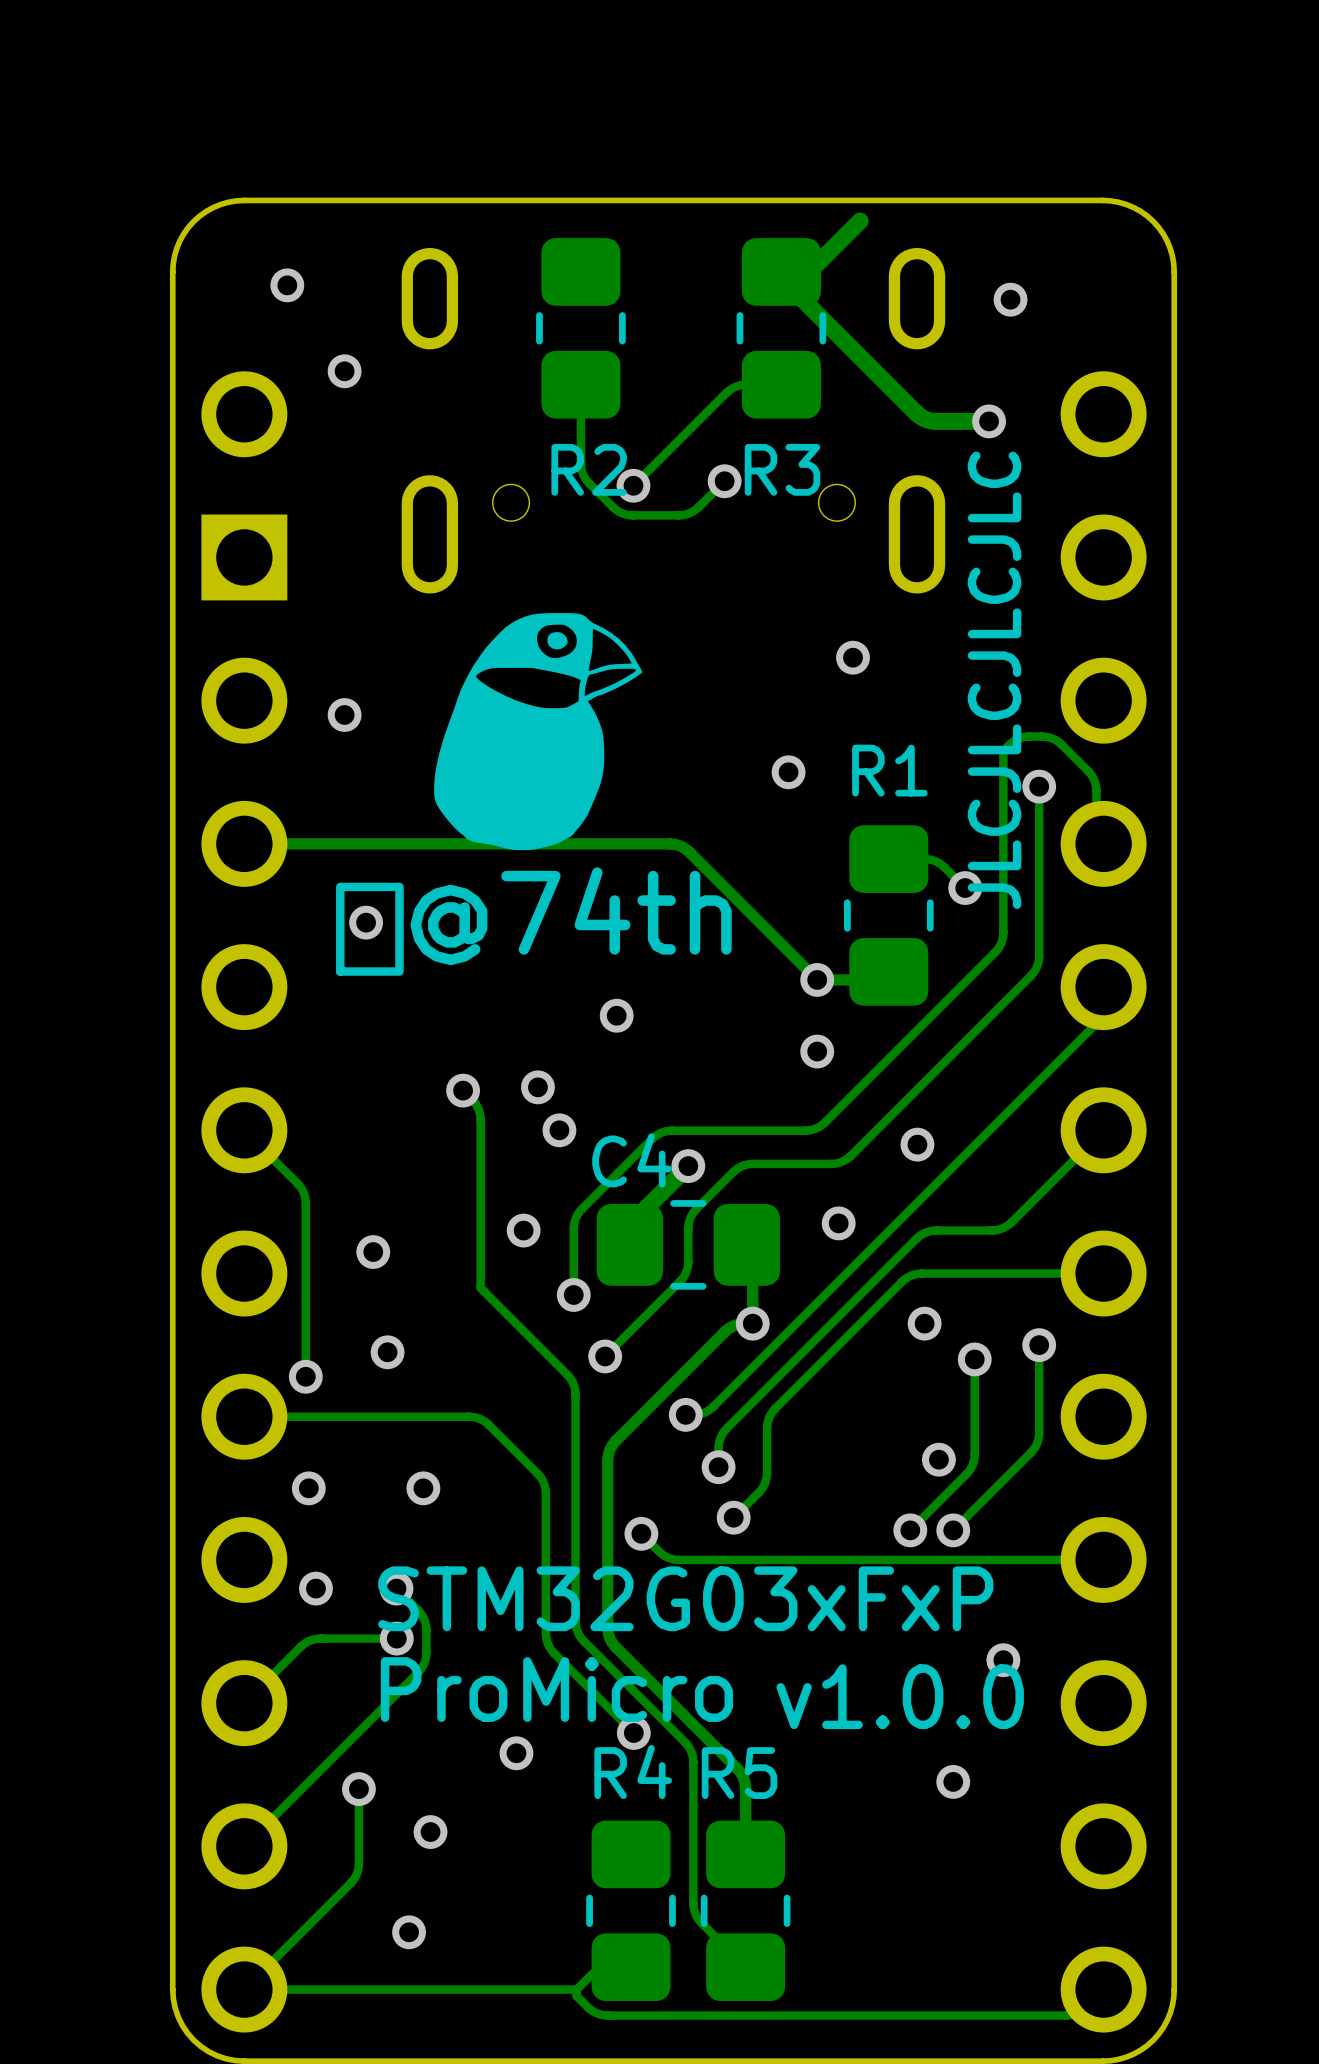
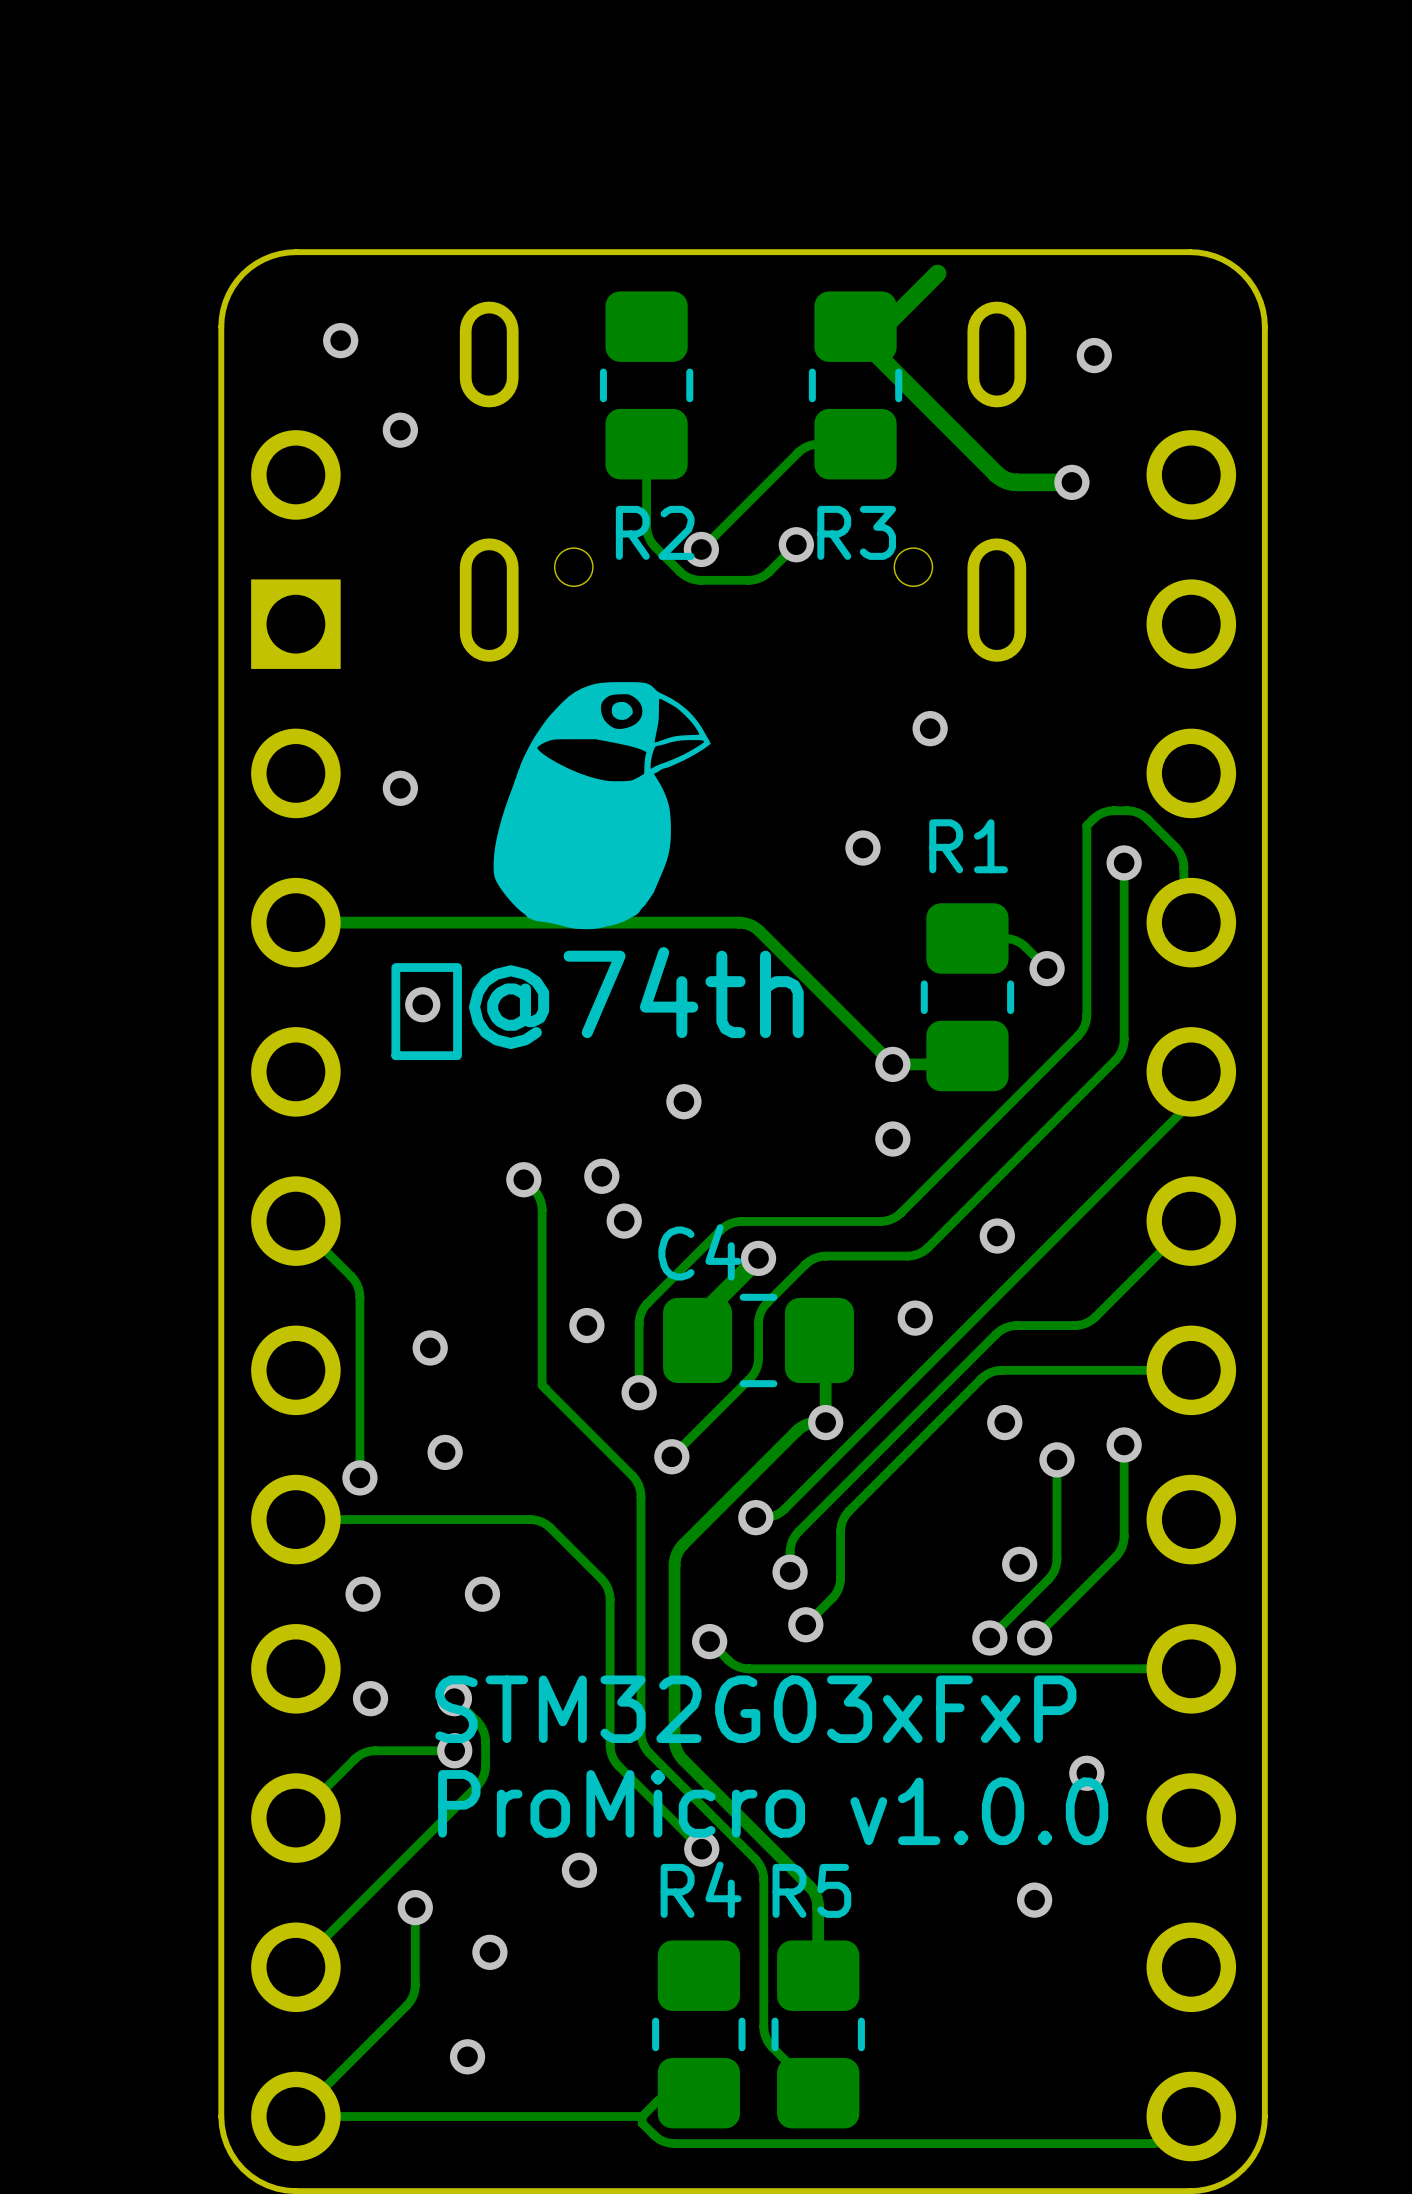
drawing: [967, 451, 1022, 909] -> none

